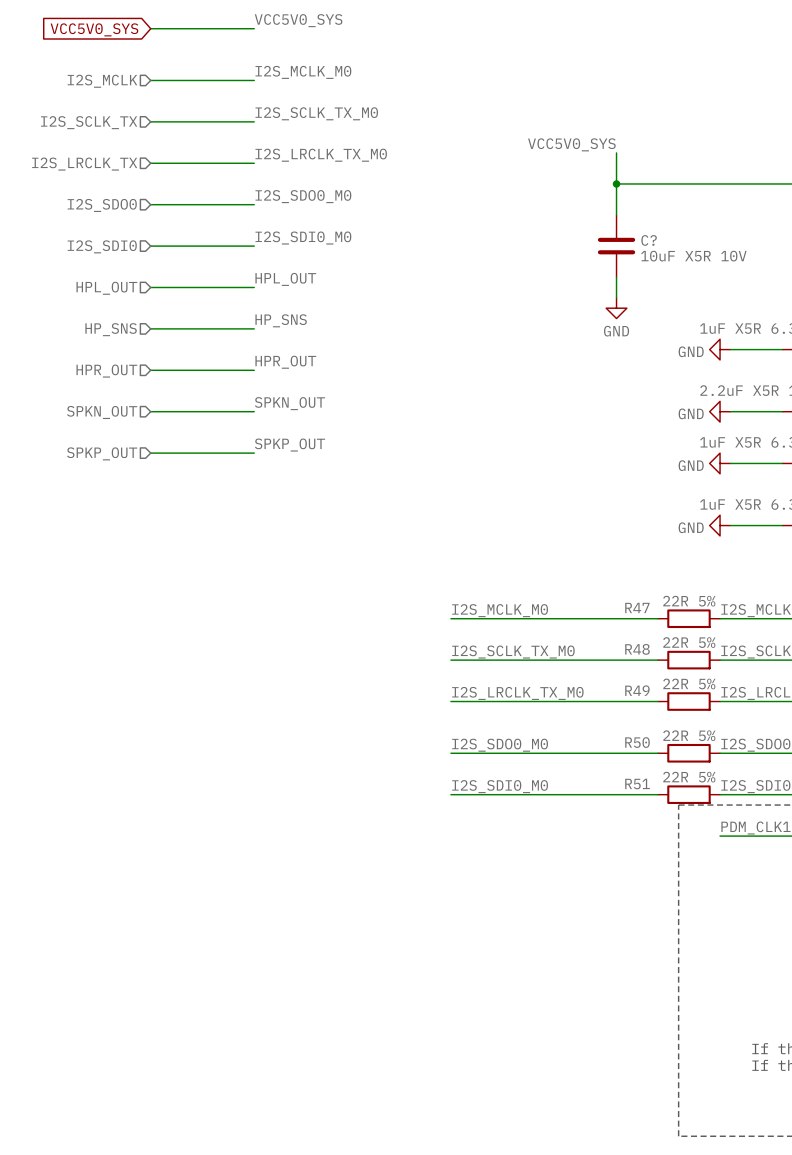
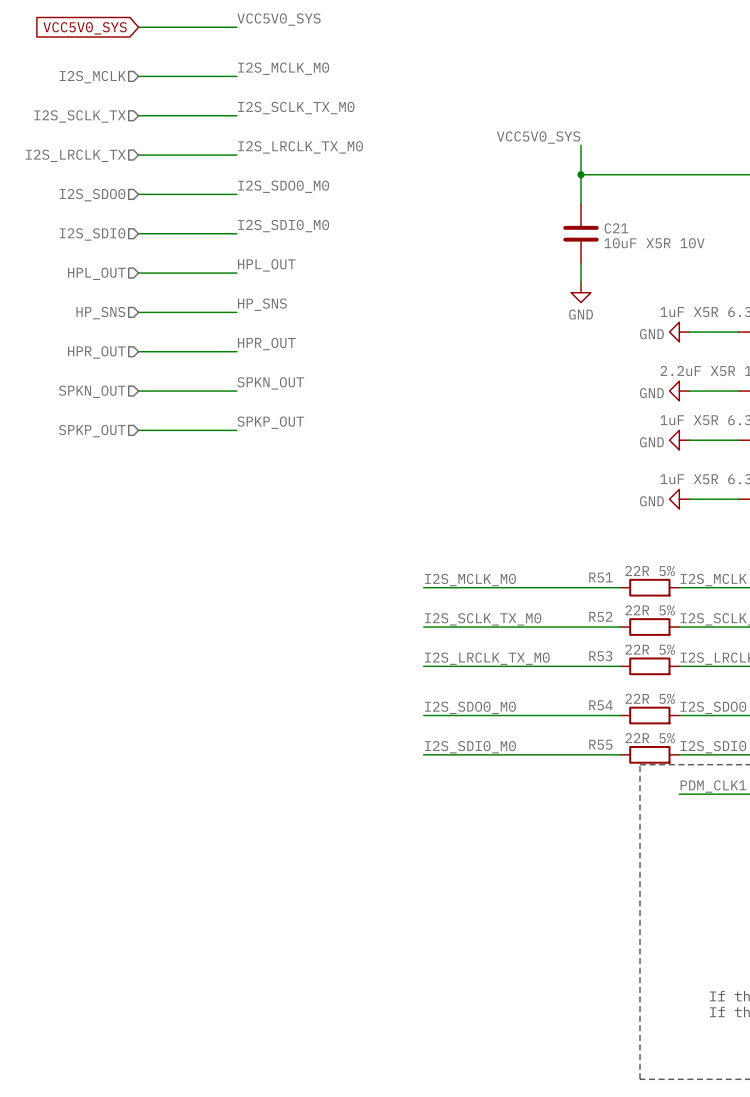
C? name: C? (649, 240) -> C21 (616, 228)
R47 name: R47 (637, 607) -> R51 (600, 577)
R48 name: R48 (637, 649) -> R52 (600, 616)
R49 name: R49 (637, 690) -> R53 (600, 656)
R50 name: R50 (637, 742) -> R54 (601, 705)
R51 name: R51 (637, 784) -> R55 (600, 744)

